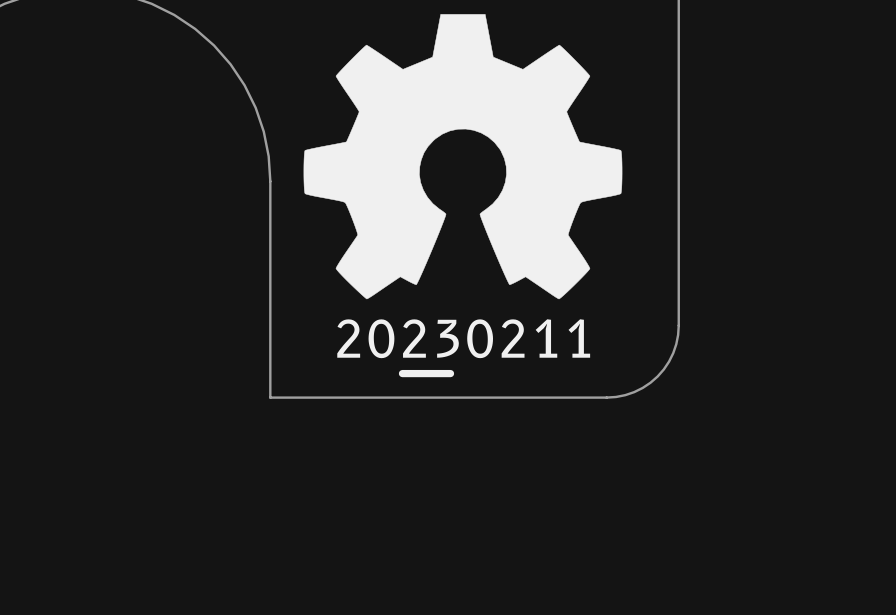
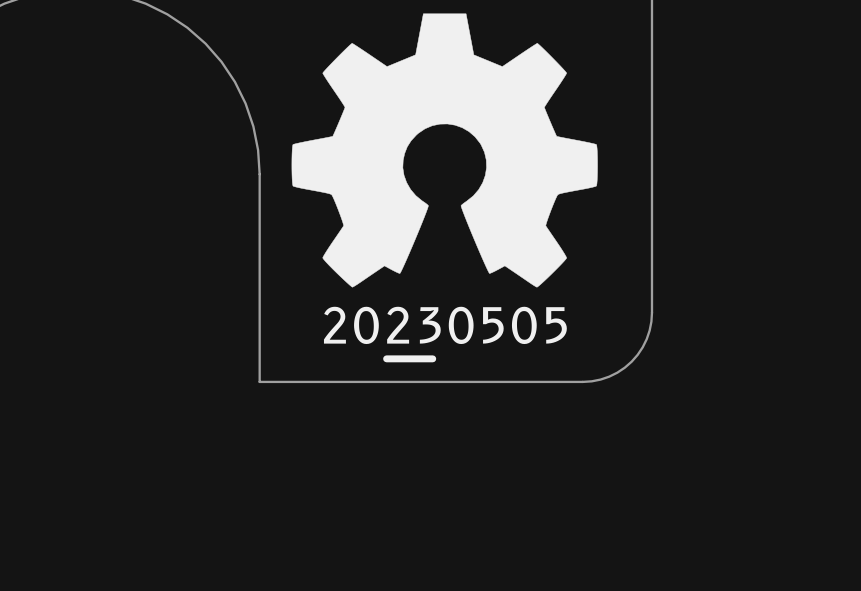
drawing shape: [337, 319, 591, 378] -> [323, 306, 567, 363]

